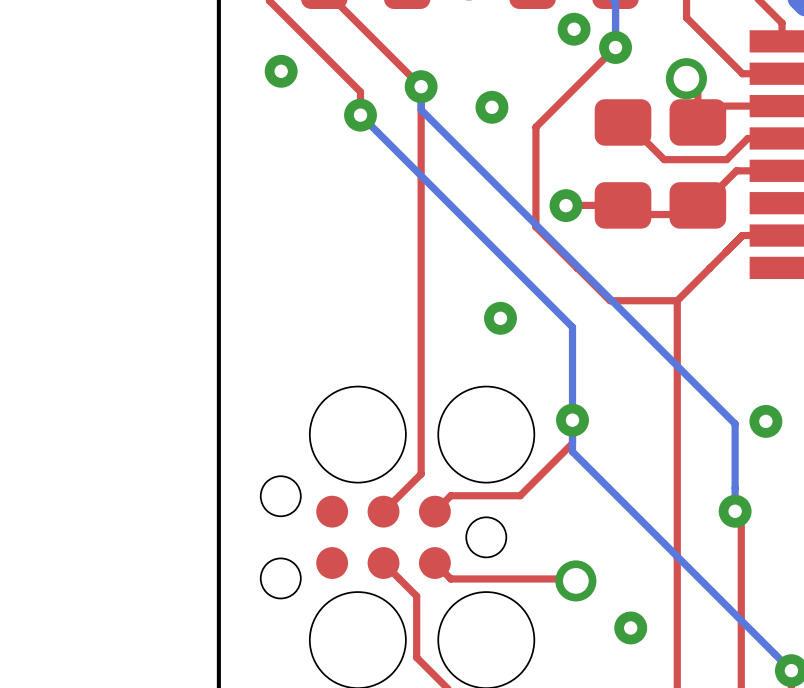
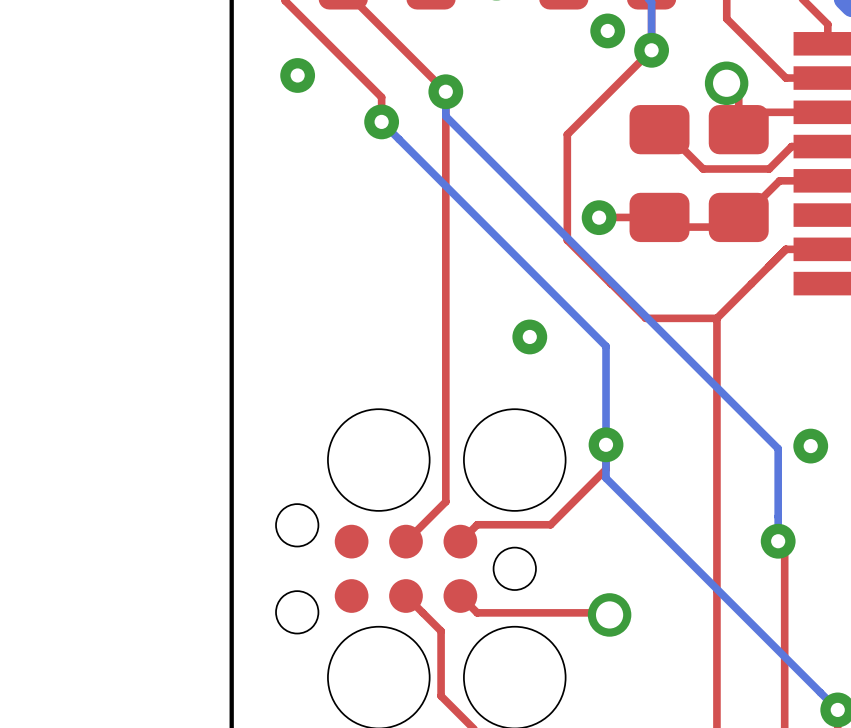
part: (491, 107) -> none
part: (630, 627) -> none

